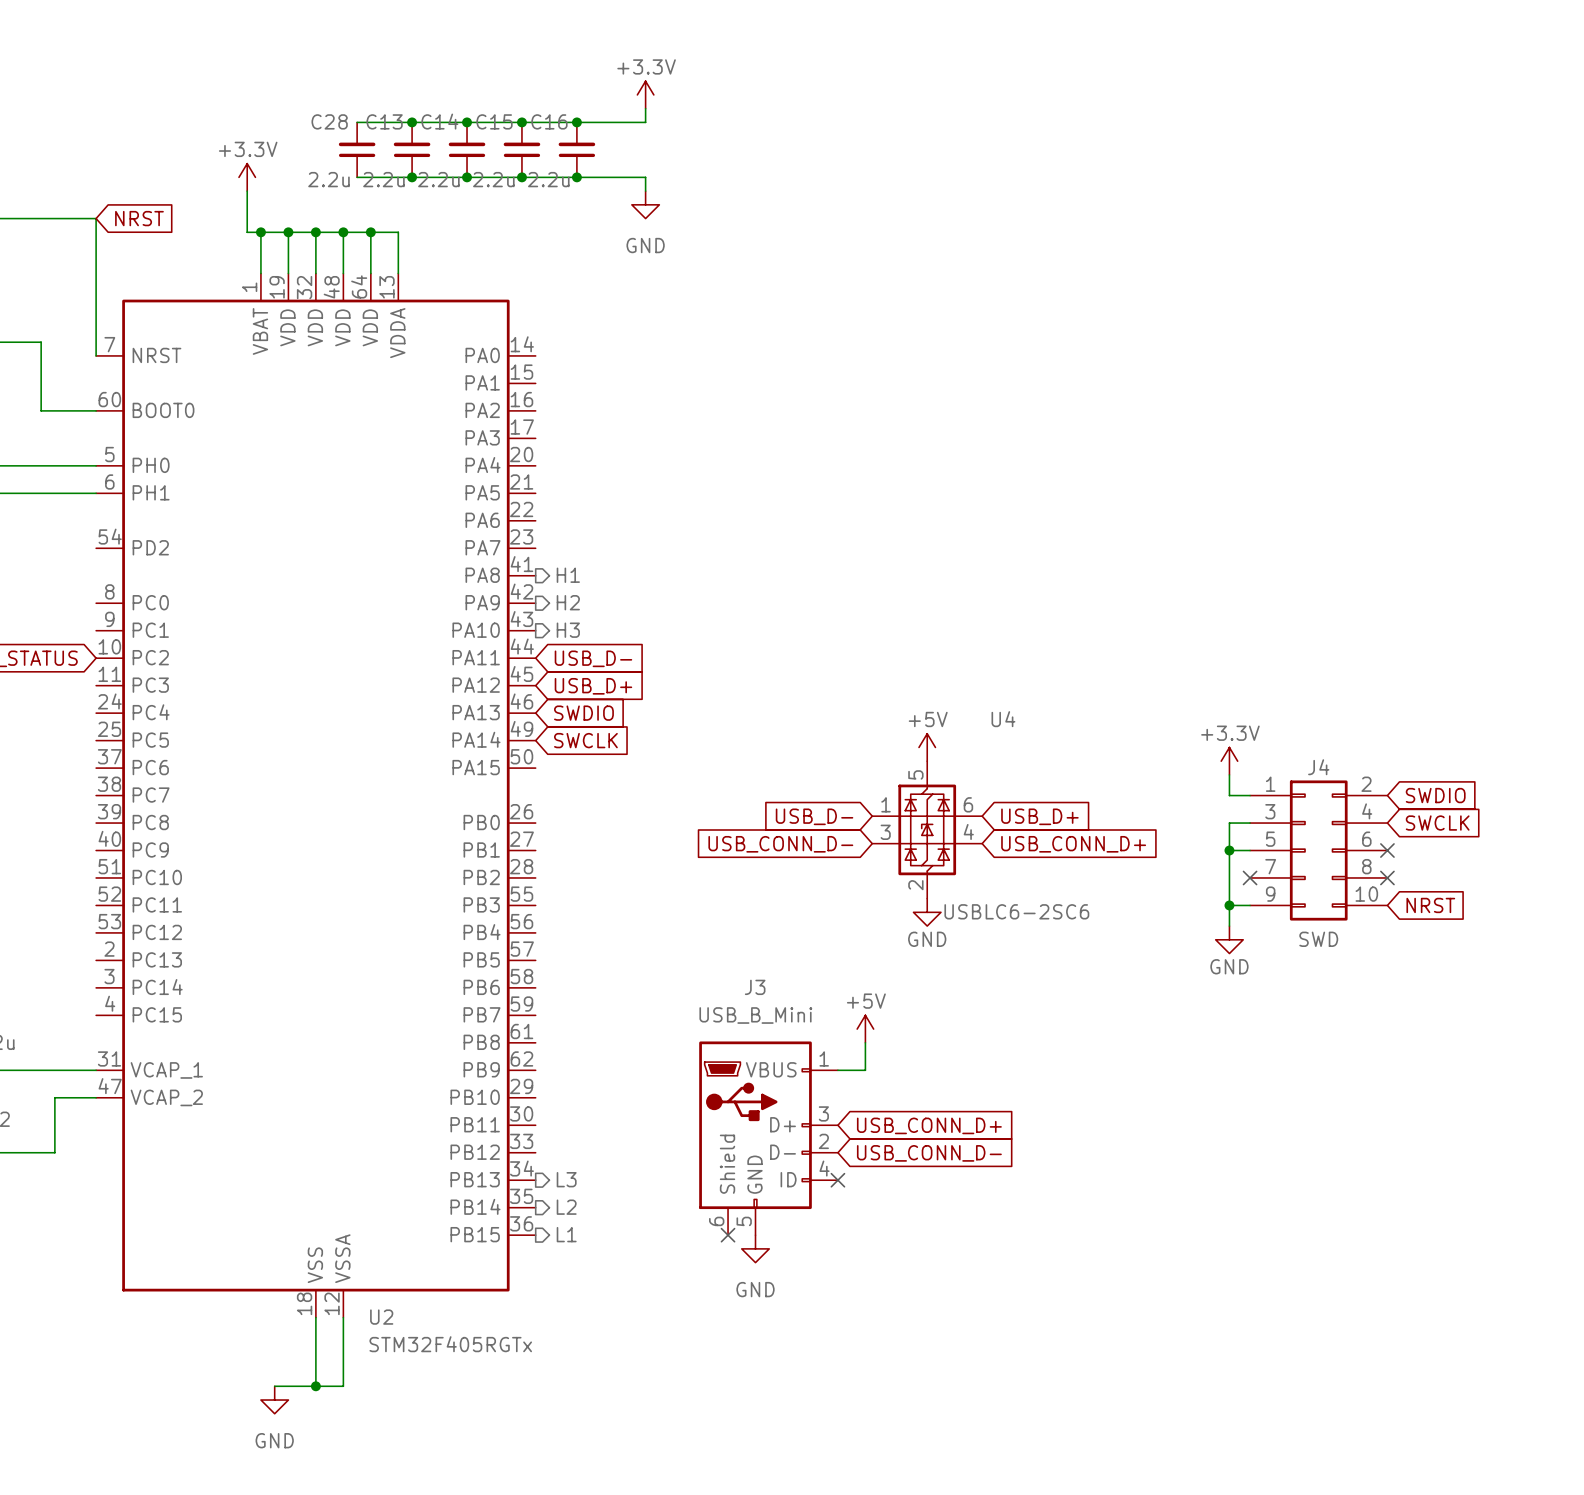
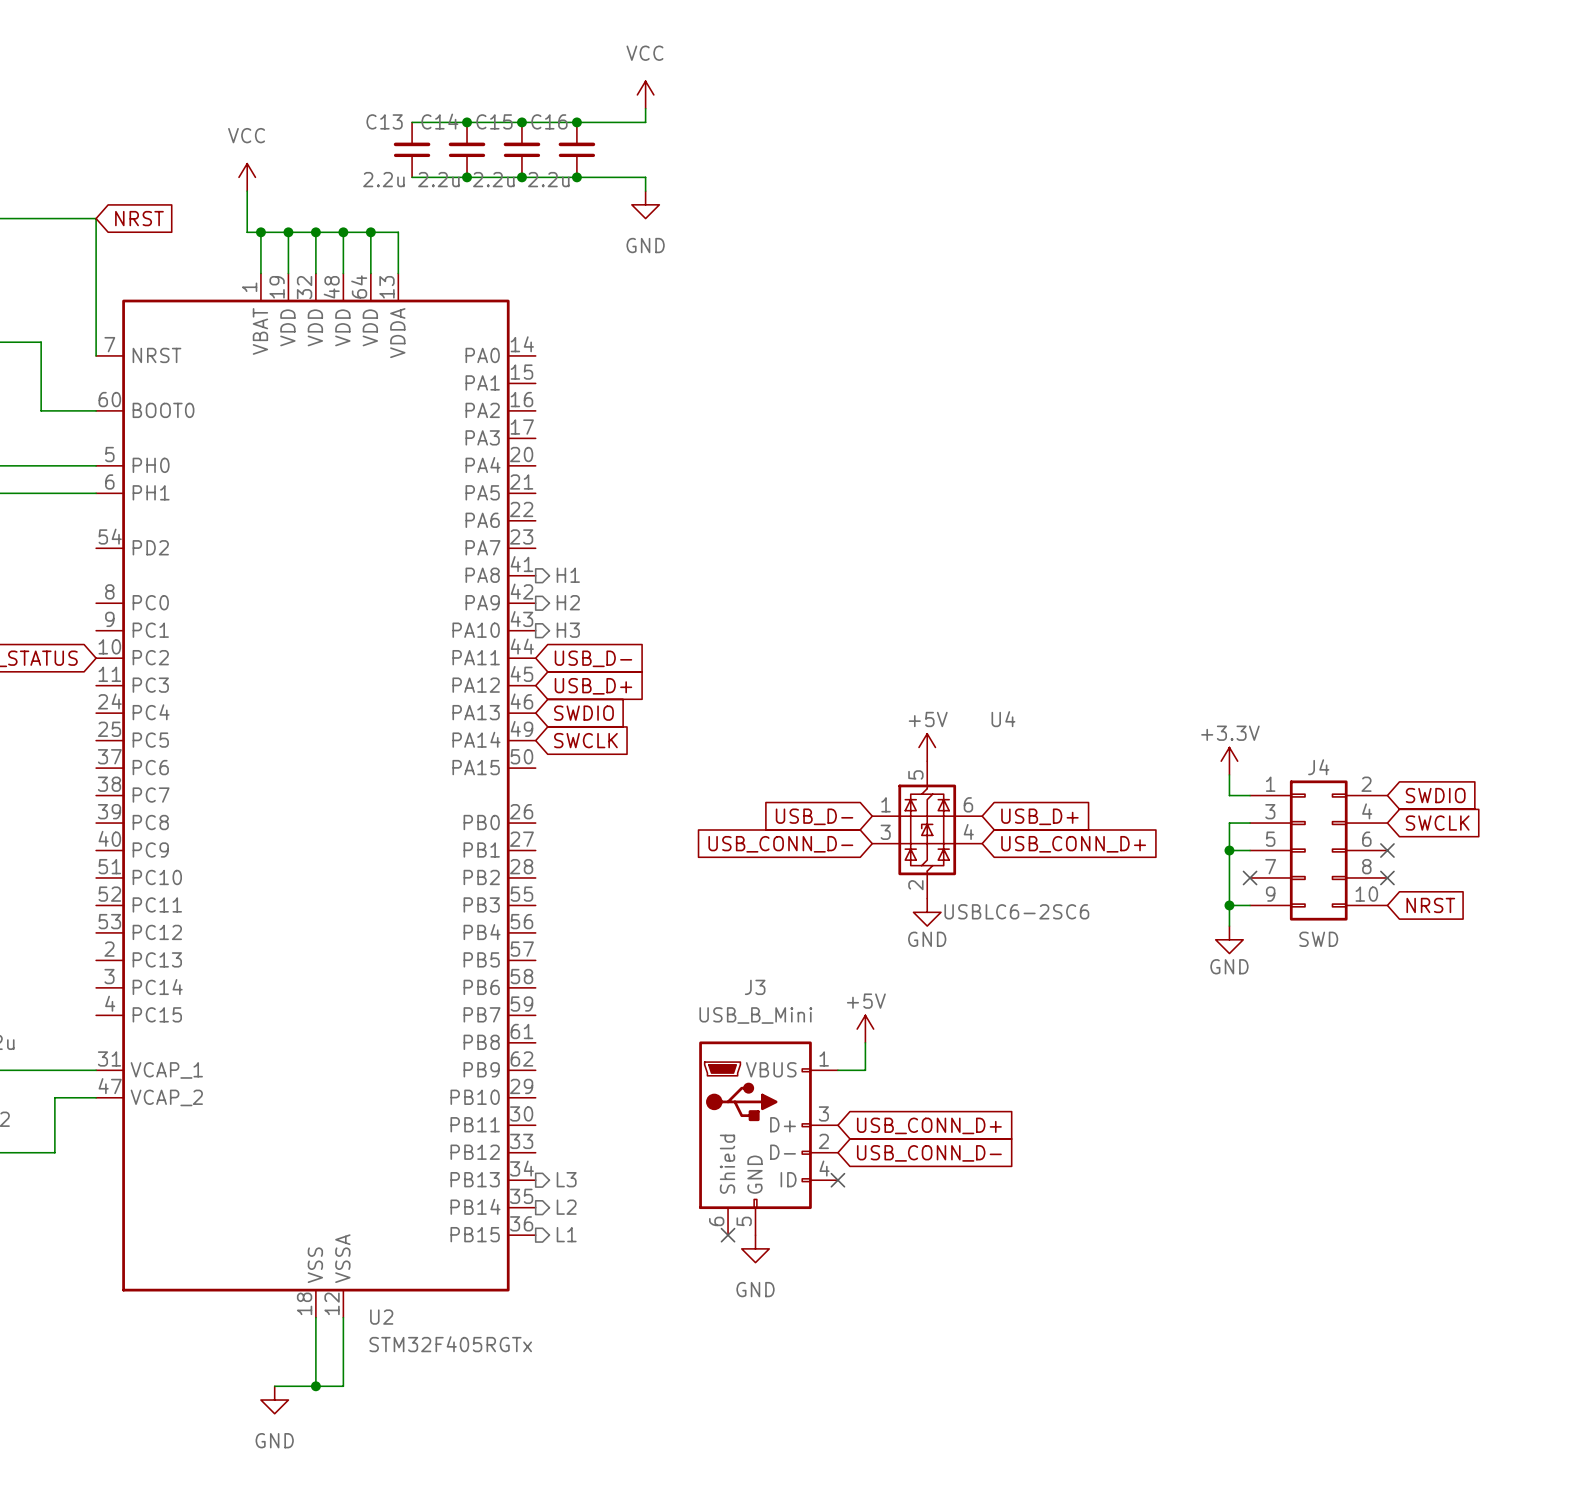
power symbol: +3.3V (645, 94) -> VCC (645, 94)
wire: (357, 122) (412, 122) -> none
junction: (412, 122) -> none
C28: 2.2u (357, 149) -> none
power symbol: +3.3V (247, 177) -> VCC (247, 177)
wire: (357, 177) (412, 177) -> none
junction: (412, 177) -> none

